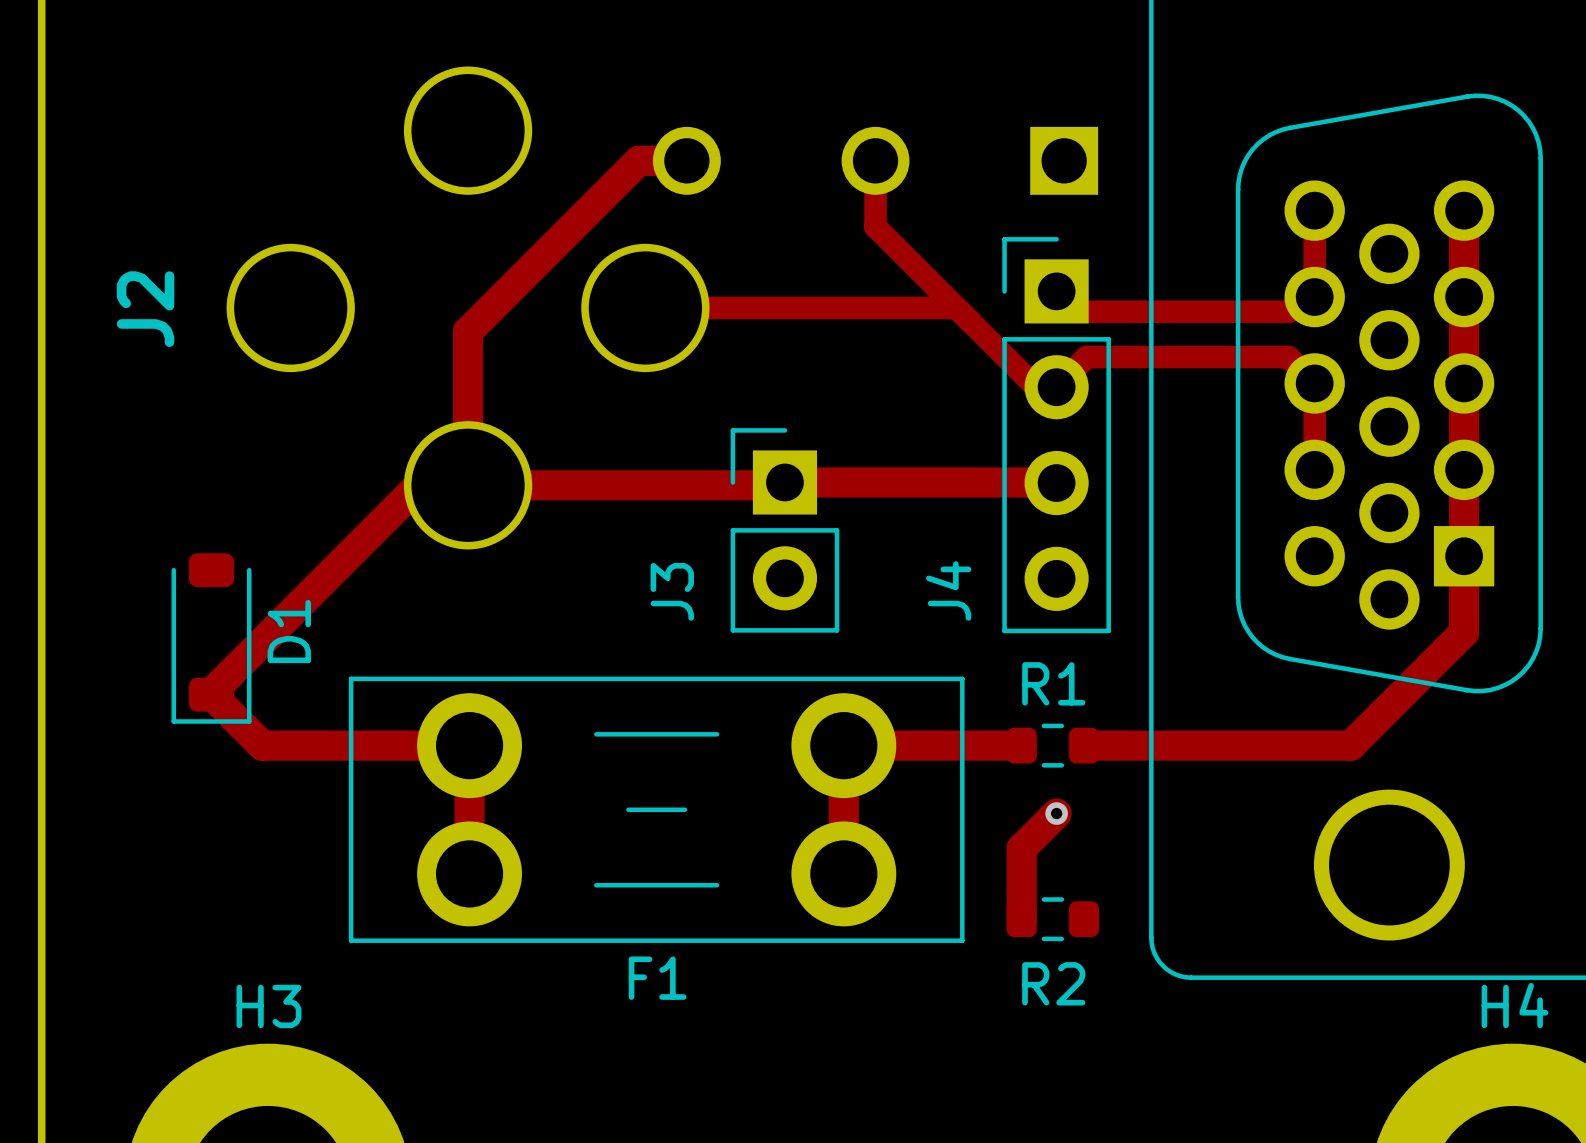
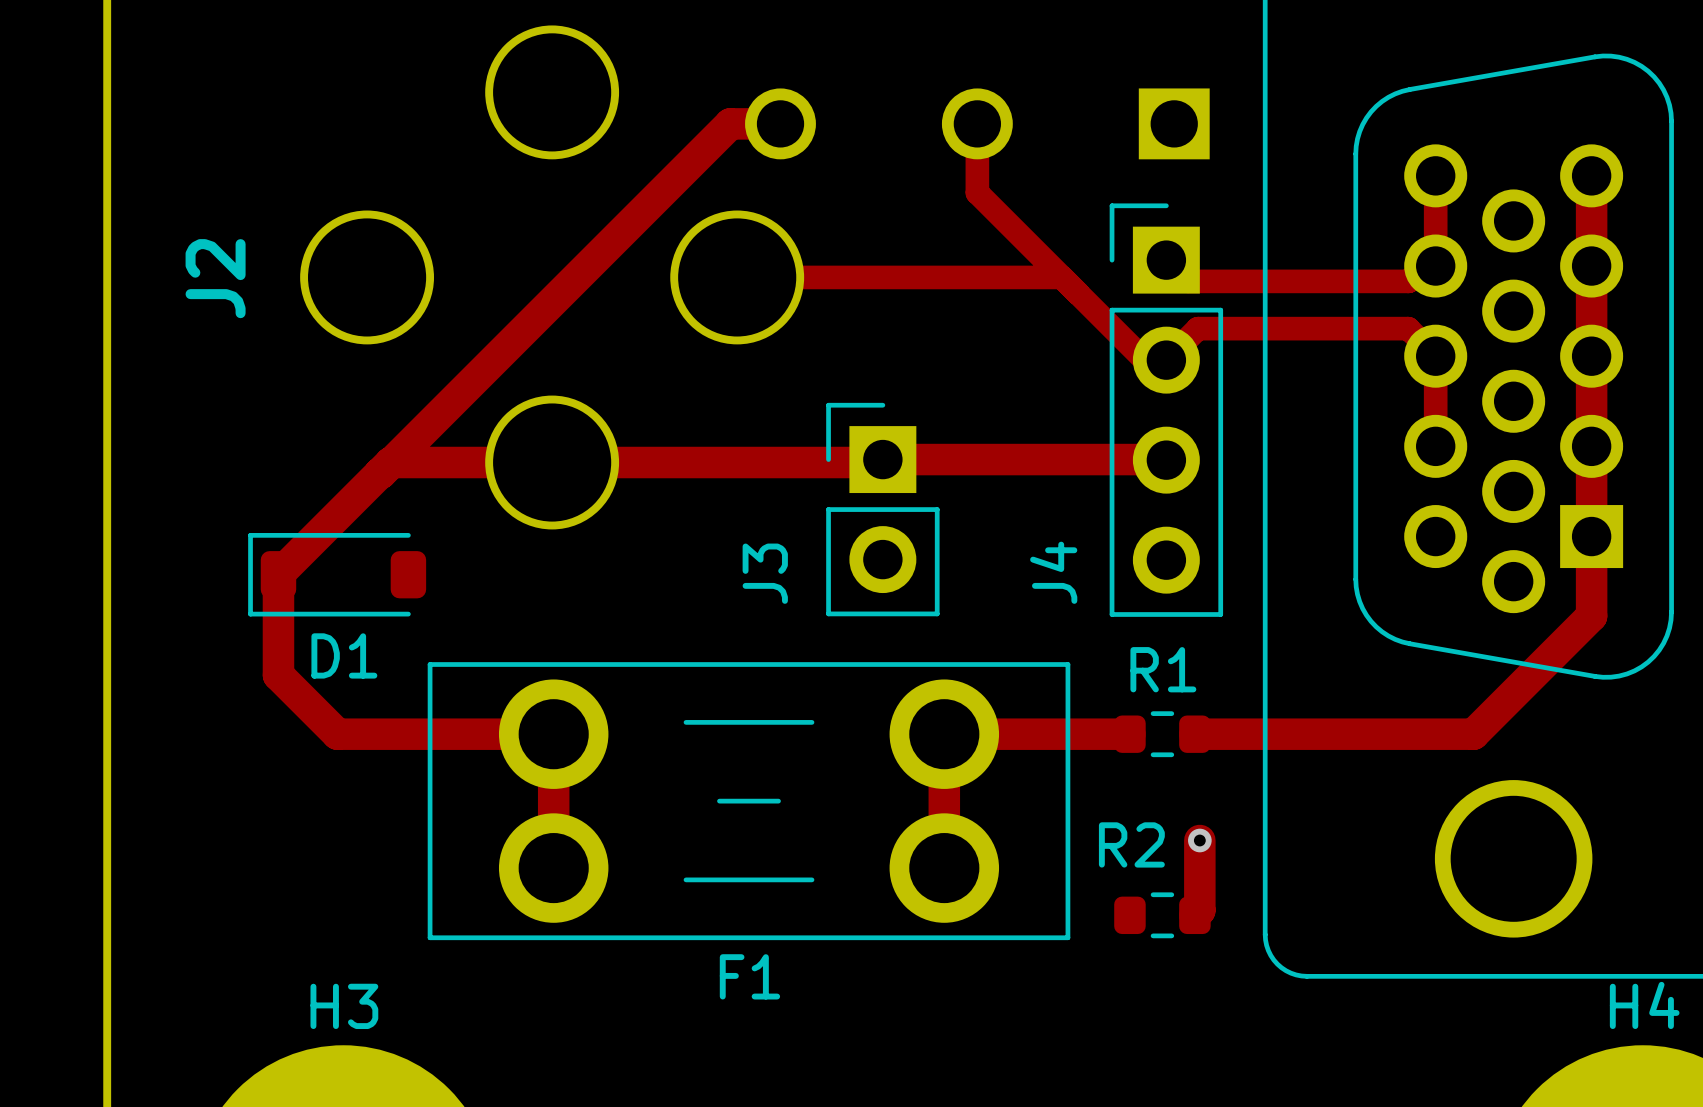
track: (468, 331) (468, 485) -> (552, 302) (379, 473)
track: (419, 485) (211, 694) -> (500, 462) (390, 462) (278, 574) (278, 675) (284, 681)
D1 rotation: 0° (211, 638) -> 90° clockwise (337, 574)
track: (1056, 813) (1021, 848) (1021, 919) -> none
via position: (1056, 813) -> (1199, 840)
track: none -> (1199, 840) (1199, 910) (1194, 915)
R2 name position: R2 (1053, 983) -> R2 (1131, 844)

